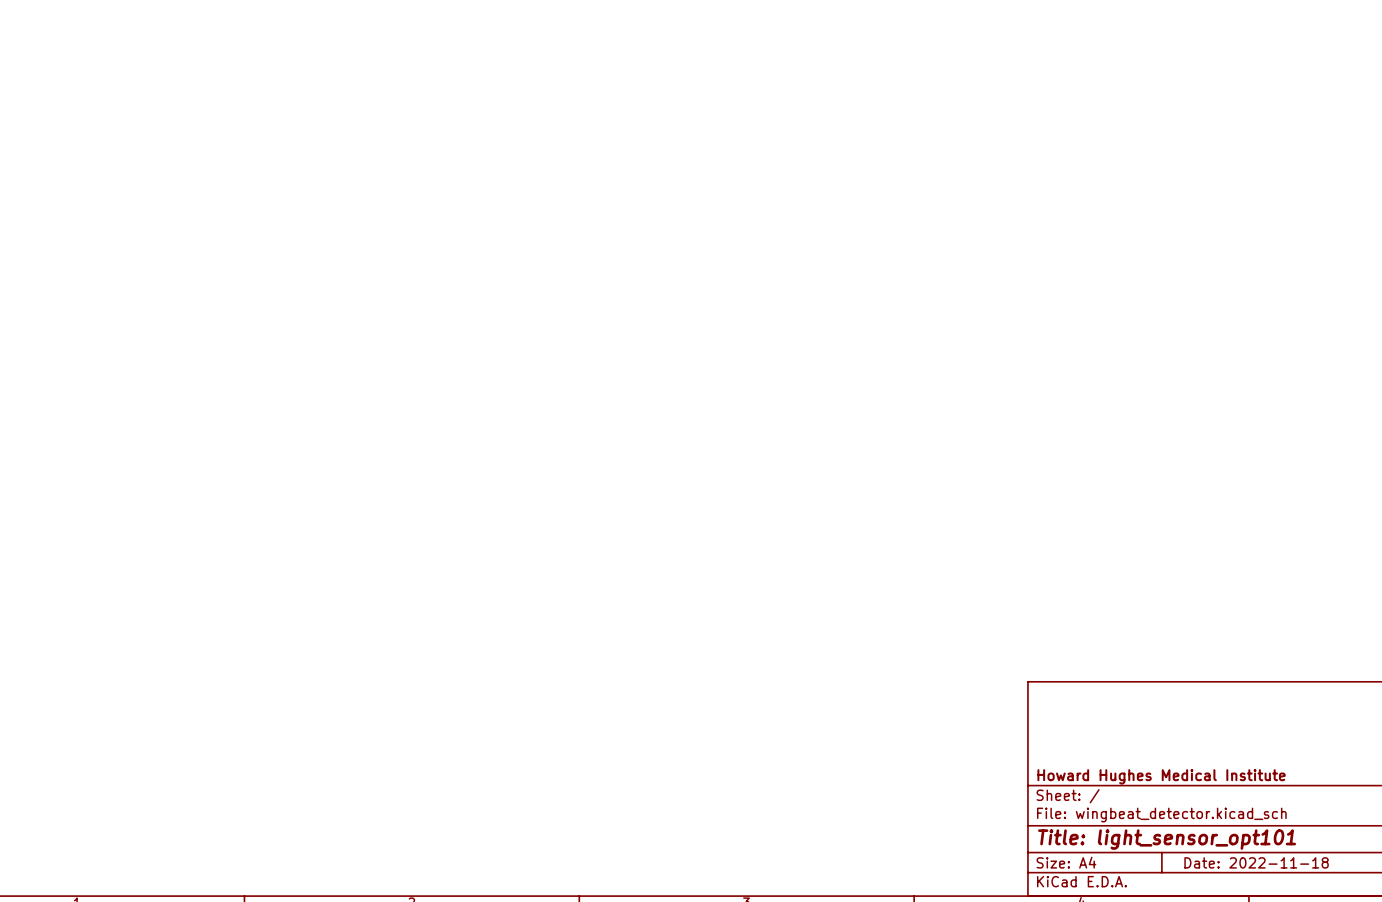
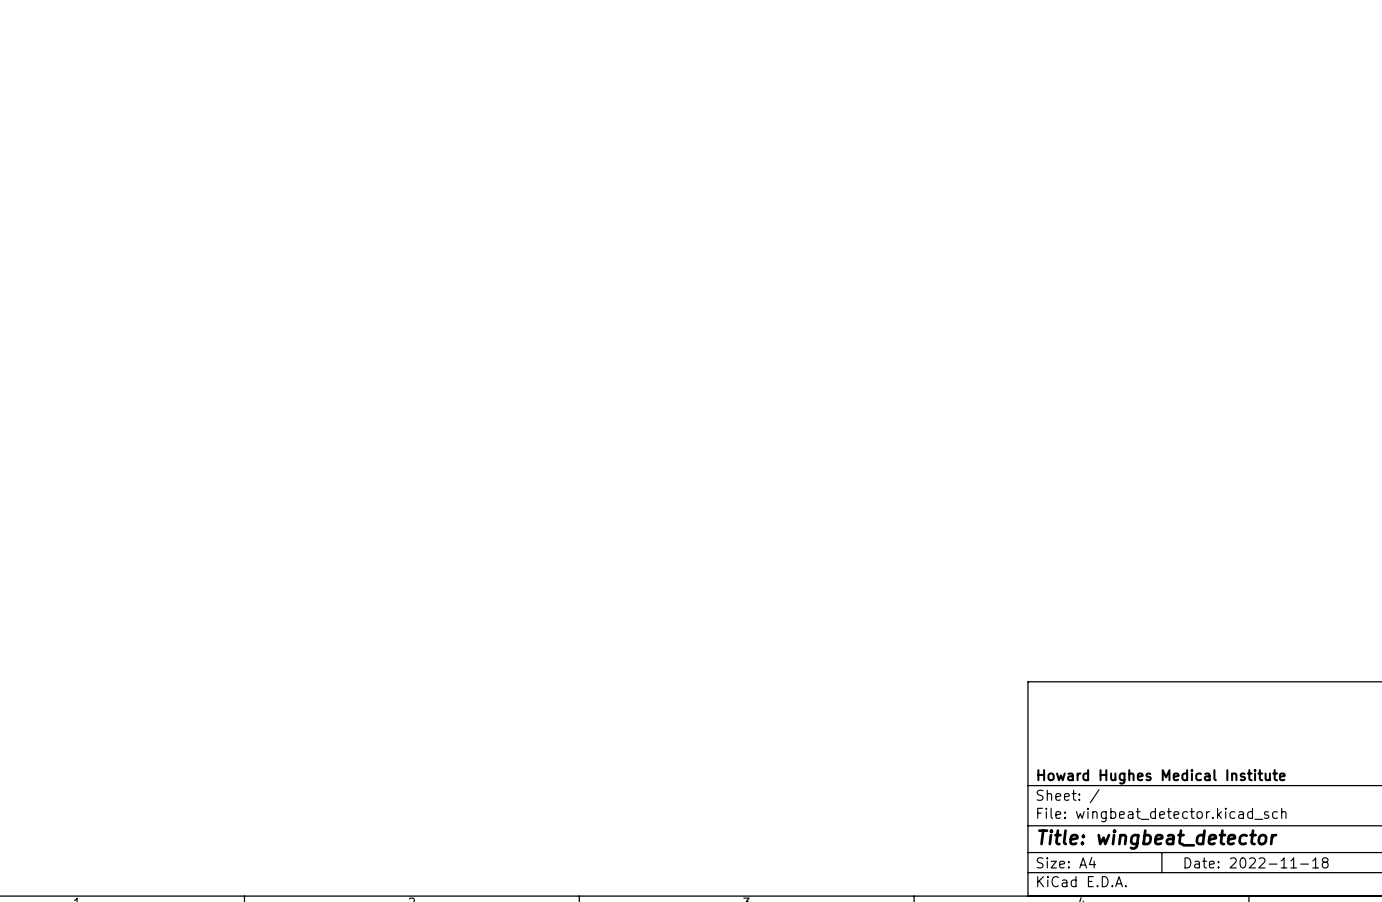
title block: Title: light_sensor_opt101 (1167, 839) -> Title: wingbeat_detector (1157, 839)

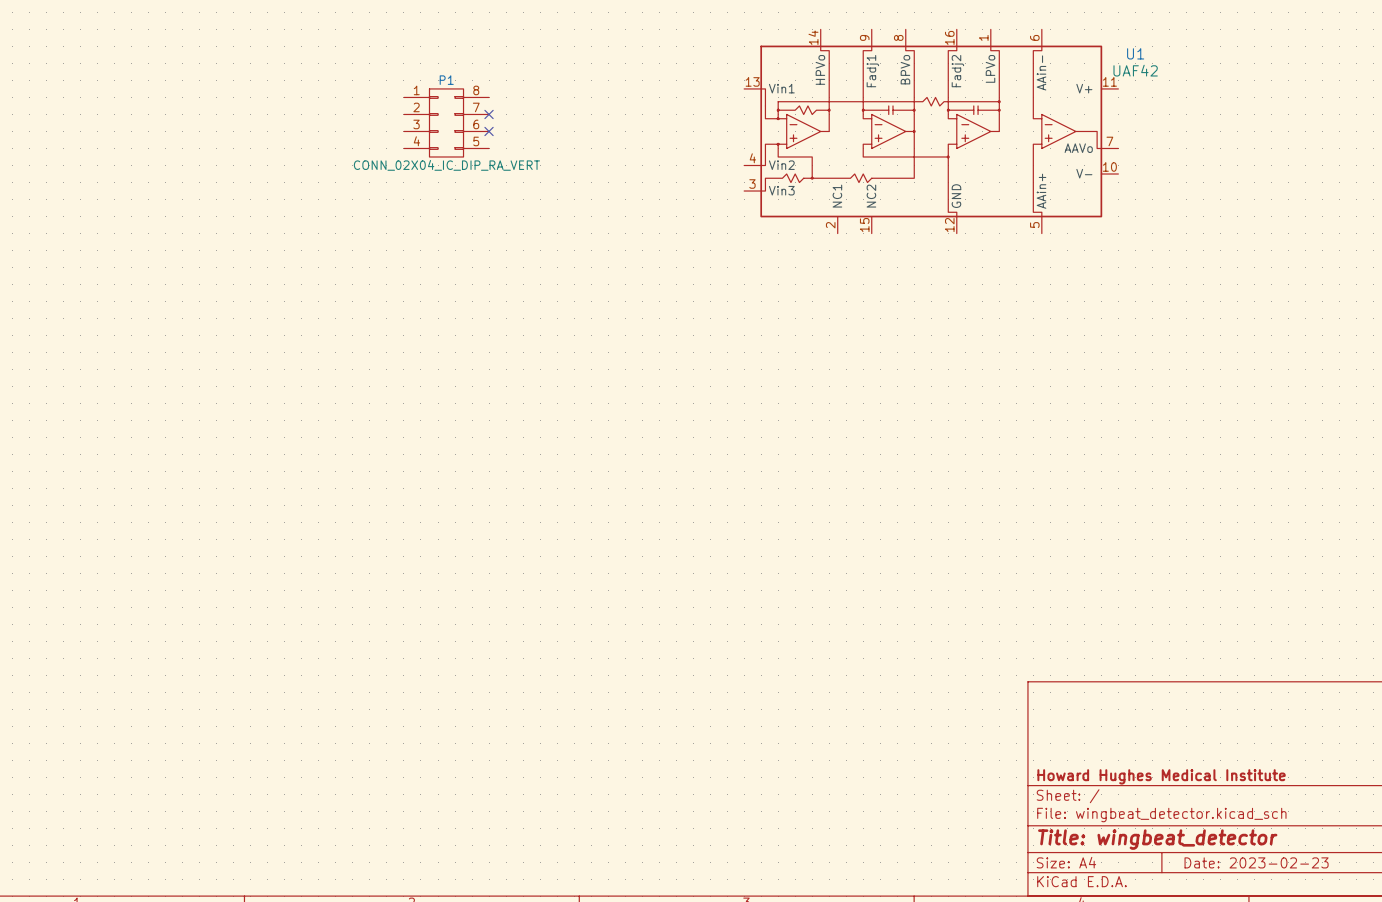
no-connect mark: none -> (489, 114)
P1: none -> CONN_02X04_IC_DIP_RA_VERT (446, 122)
no-connect mark: none -> (489, 131)
U1: none -> UAF42 (931, 131)
title block: Date: 2022-11-18 (1256, 862) -> Date: 2023-02-23 (1256, 862)

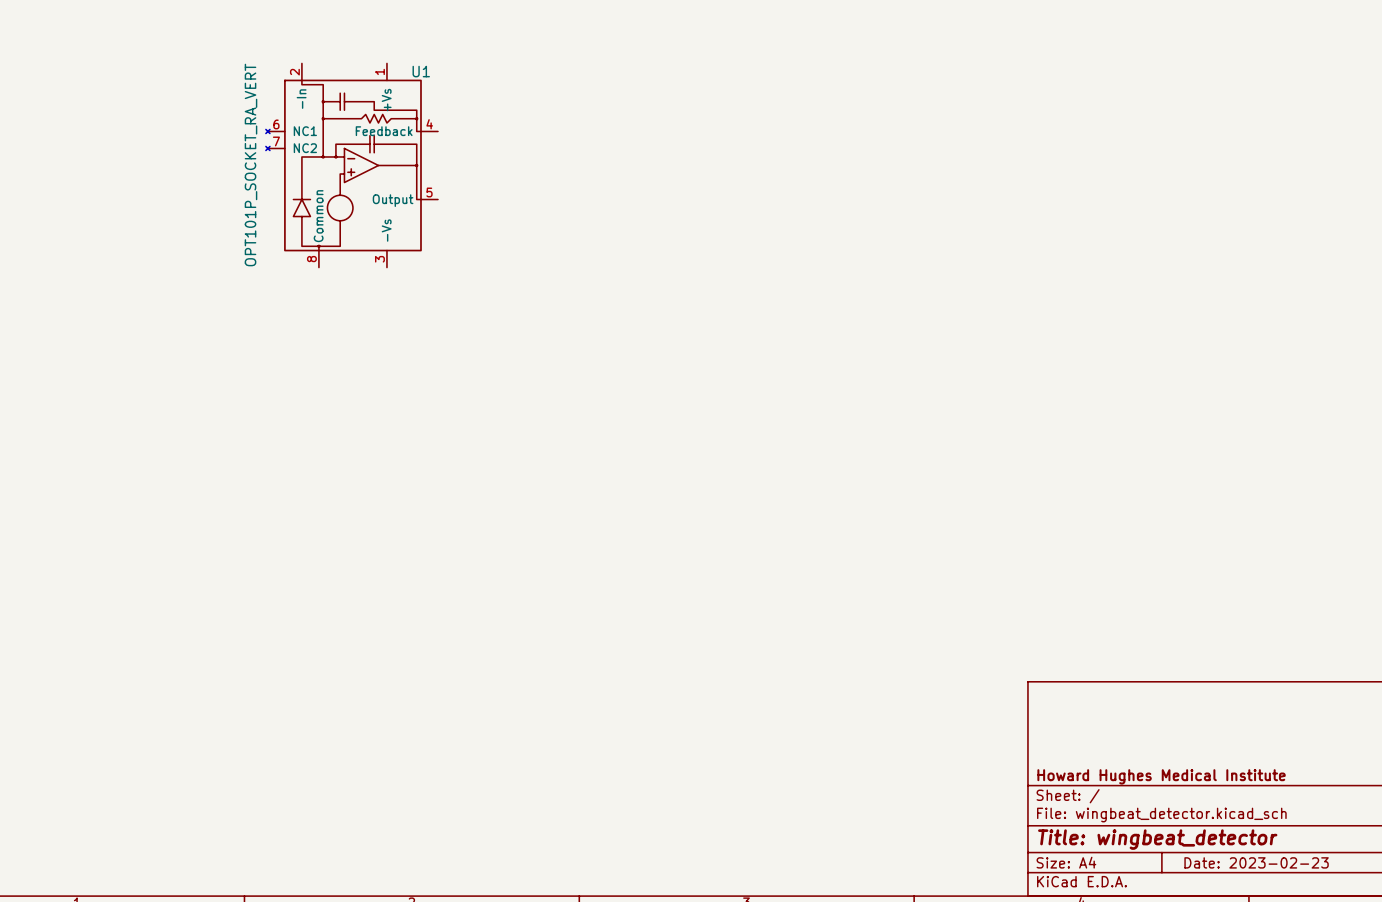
U1 symbol: [744, 29, 1119, 234] -> [265, 63, 439, 268]
U1 name position: U1 (1135, 53) -> U1 (421, 71)
U1 value: UAF42 (1135, 70) -> OPT101P_SOCKET_RA_VERT (251, 165)
no-connect mark: (489, 114) -> none
P1: CONN_02X04_IC_DIP_RA_VERT (446, 122) -> none
no-connect mark: (489, 131) -> none

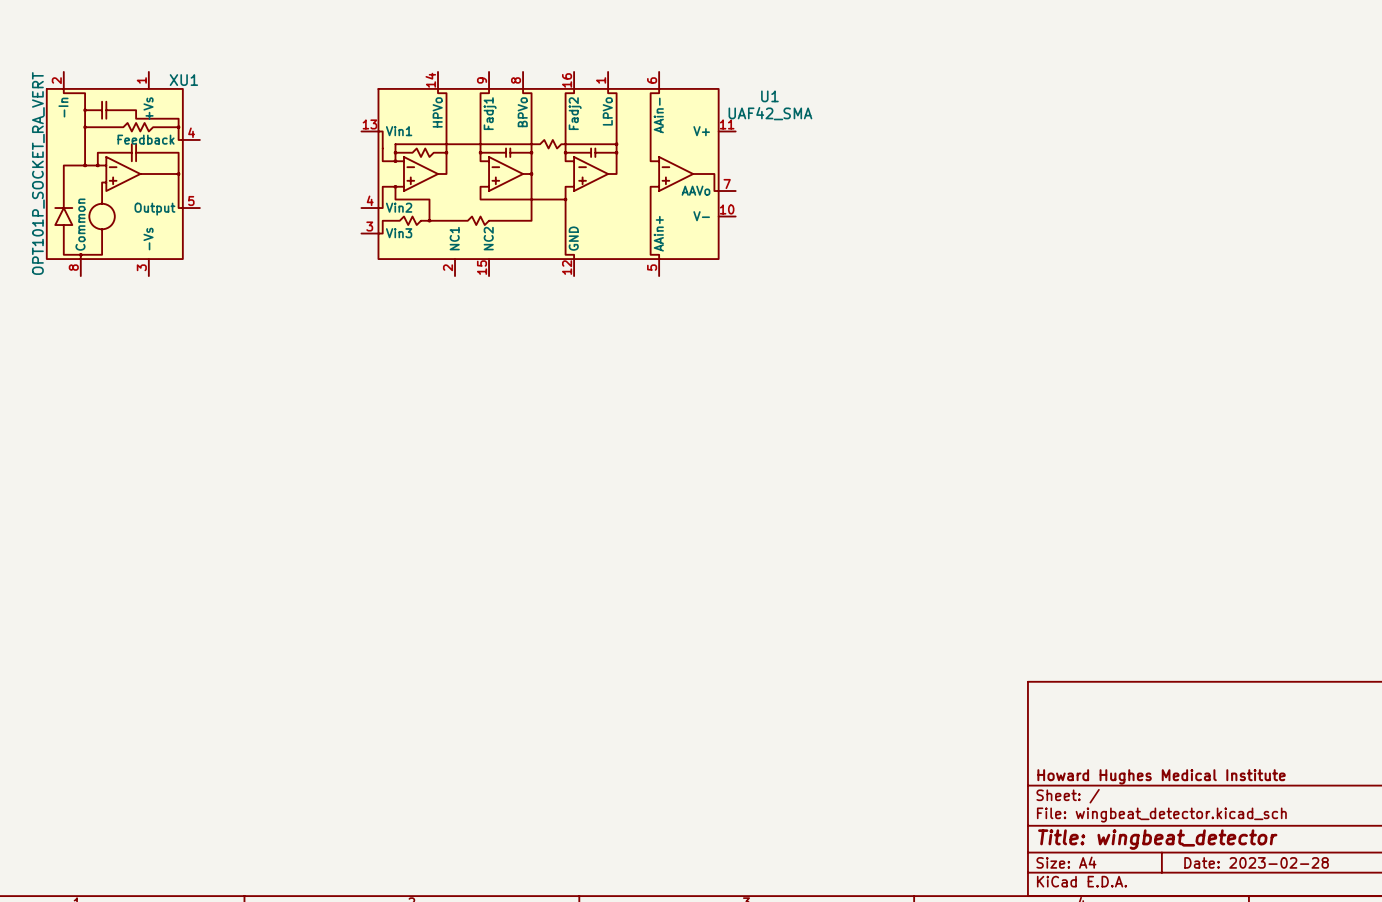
U1 symbol: [265, 63, 439, 268] -> [361, 71, 736, 277]
U1 name position: U1 (421, 71) -> U1 (769, 96)
U1 value: OPT101P_SOCKET_RA_VERT (251, 165) -> UAF42_SMA (770, 113)
XU1: none -> OPT101P_SOCKET_RA_VERT (122, 174)
title block: Date: 2023-02-23 (1256, 862) -> Date: 2023-02-28 (1256, 862)

